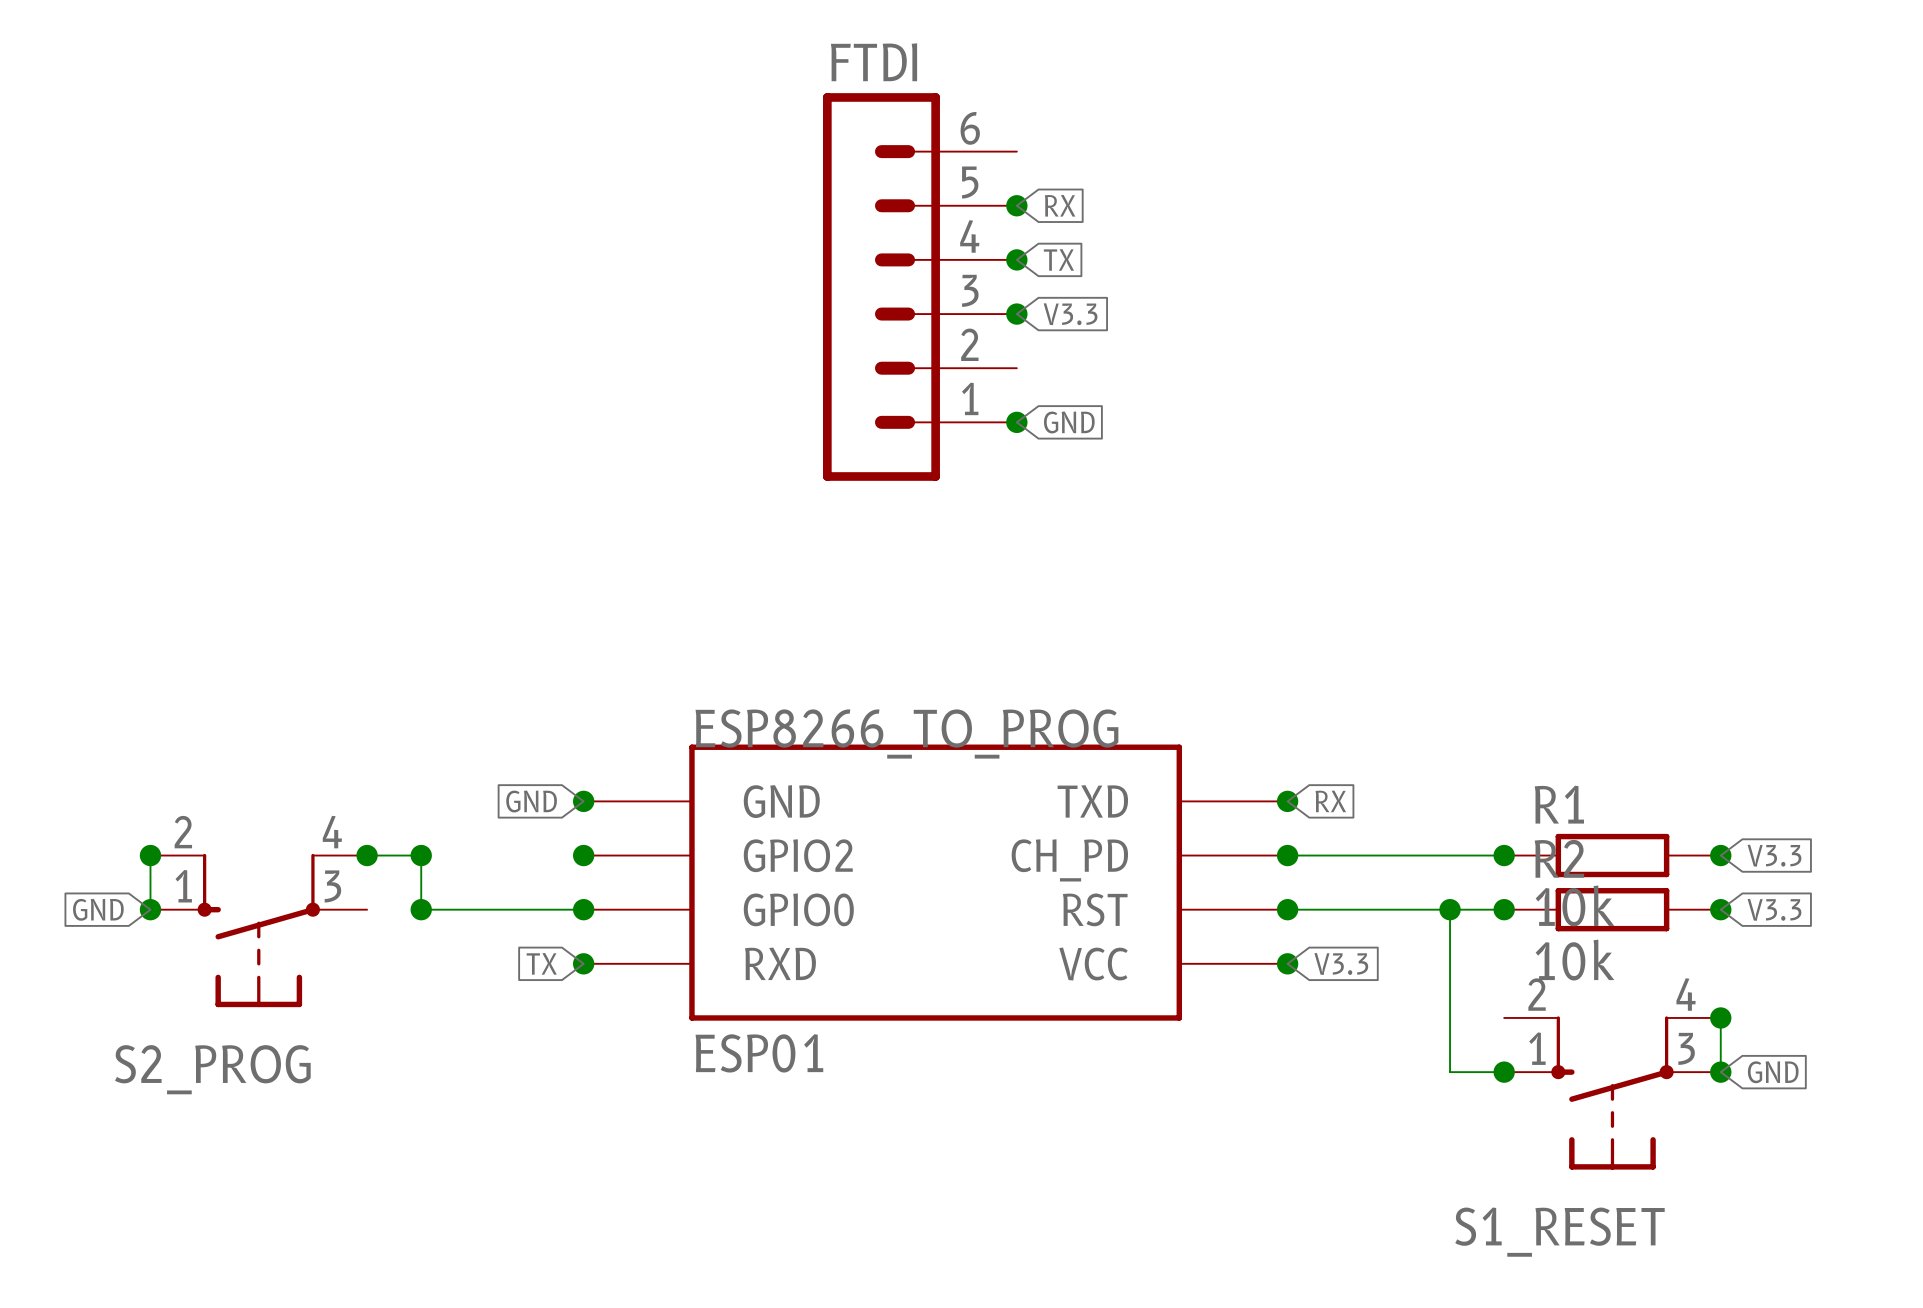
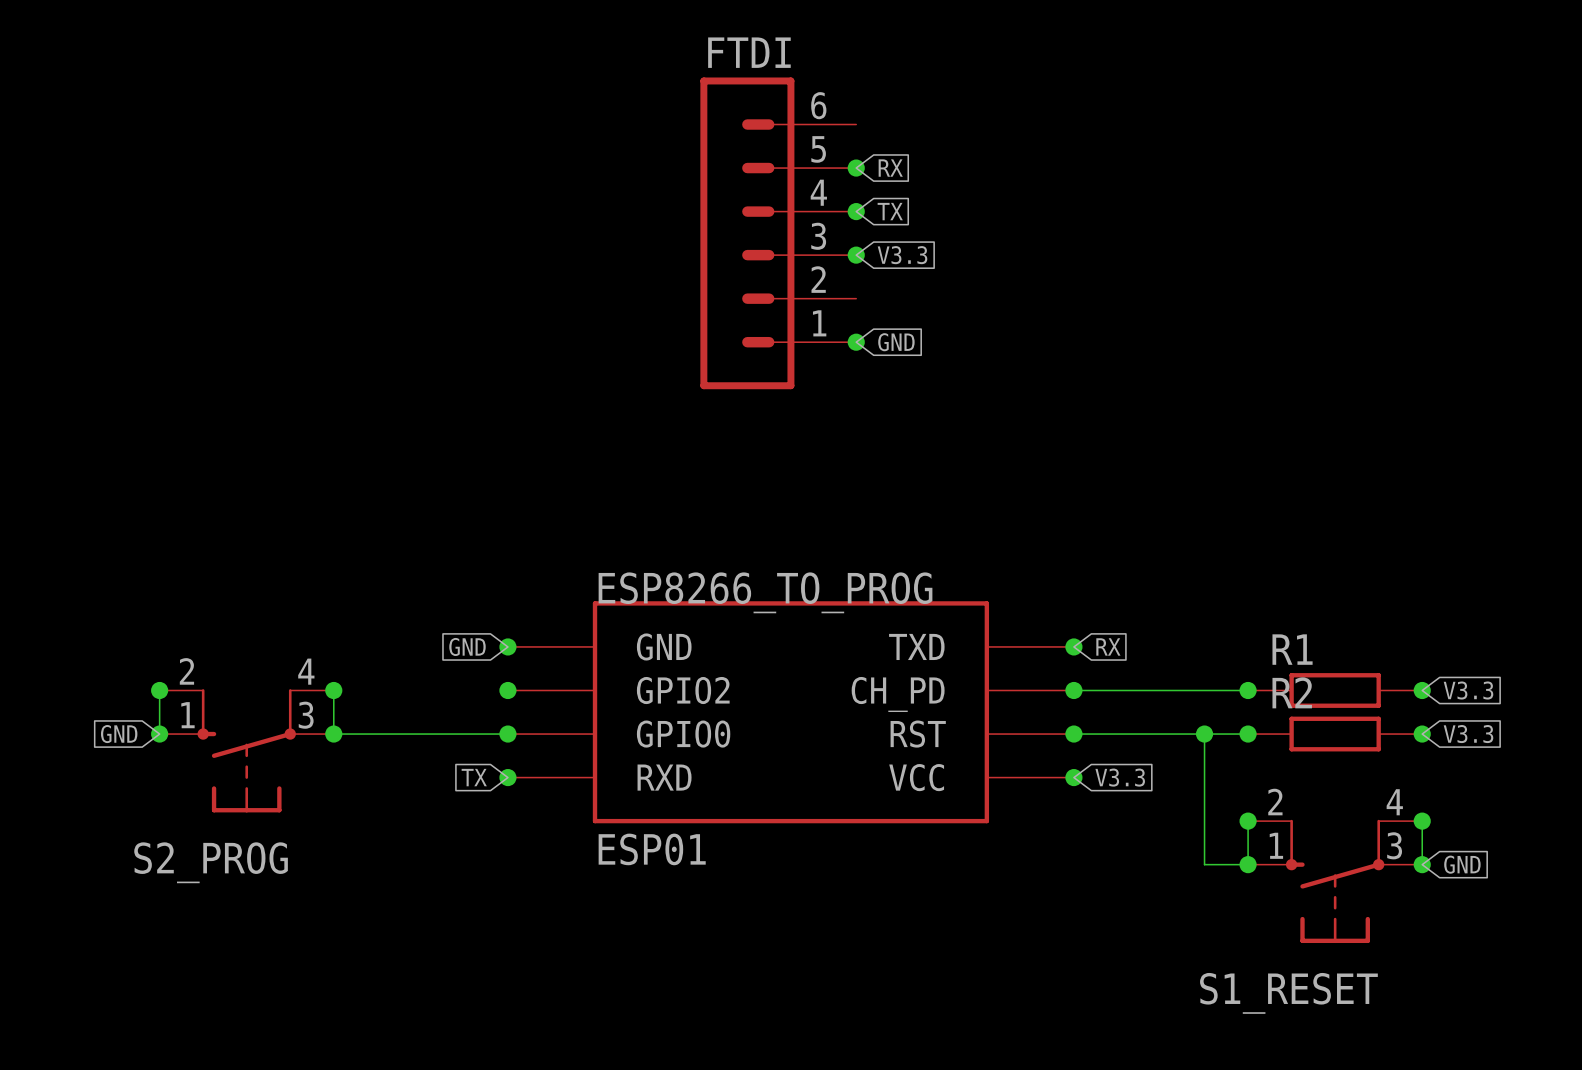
wire: (367, 855) (421, 855) (421, 909) -> (333, 690) (333, 734) (377, 734)
junction: (421, 855) -> none
R1 value: 10k (1574, 905) -> none
junction: none -> (333, 734)
junction: (421, 909) -> none
R2 value: 10k (1574, 960) -> none
wire: none -> (1248, 821) (1248, 864)
junction: none -> (1248, 821)

